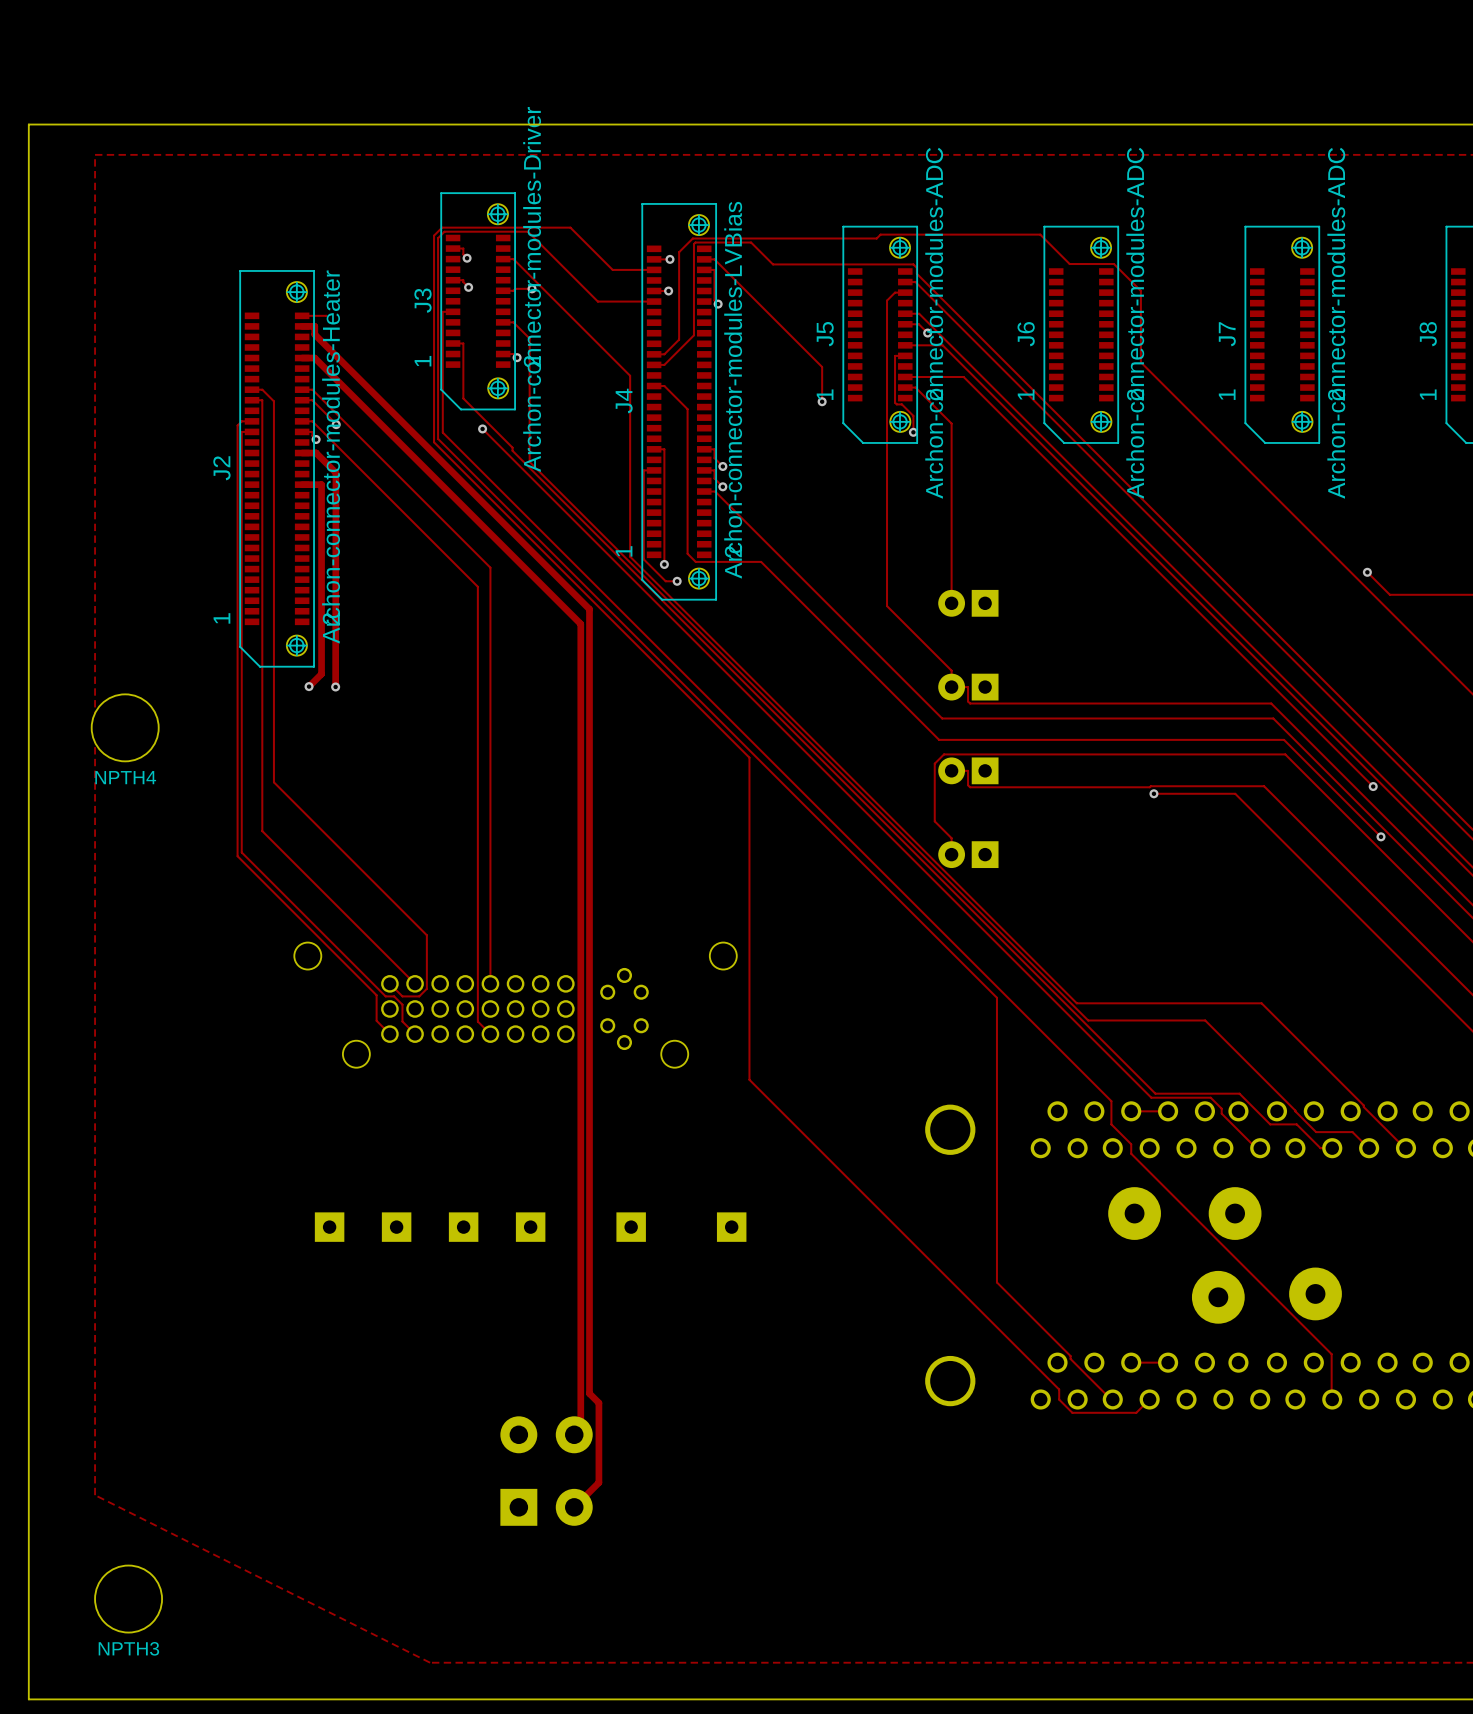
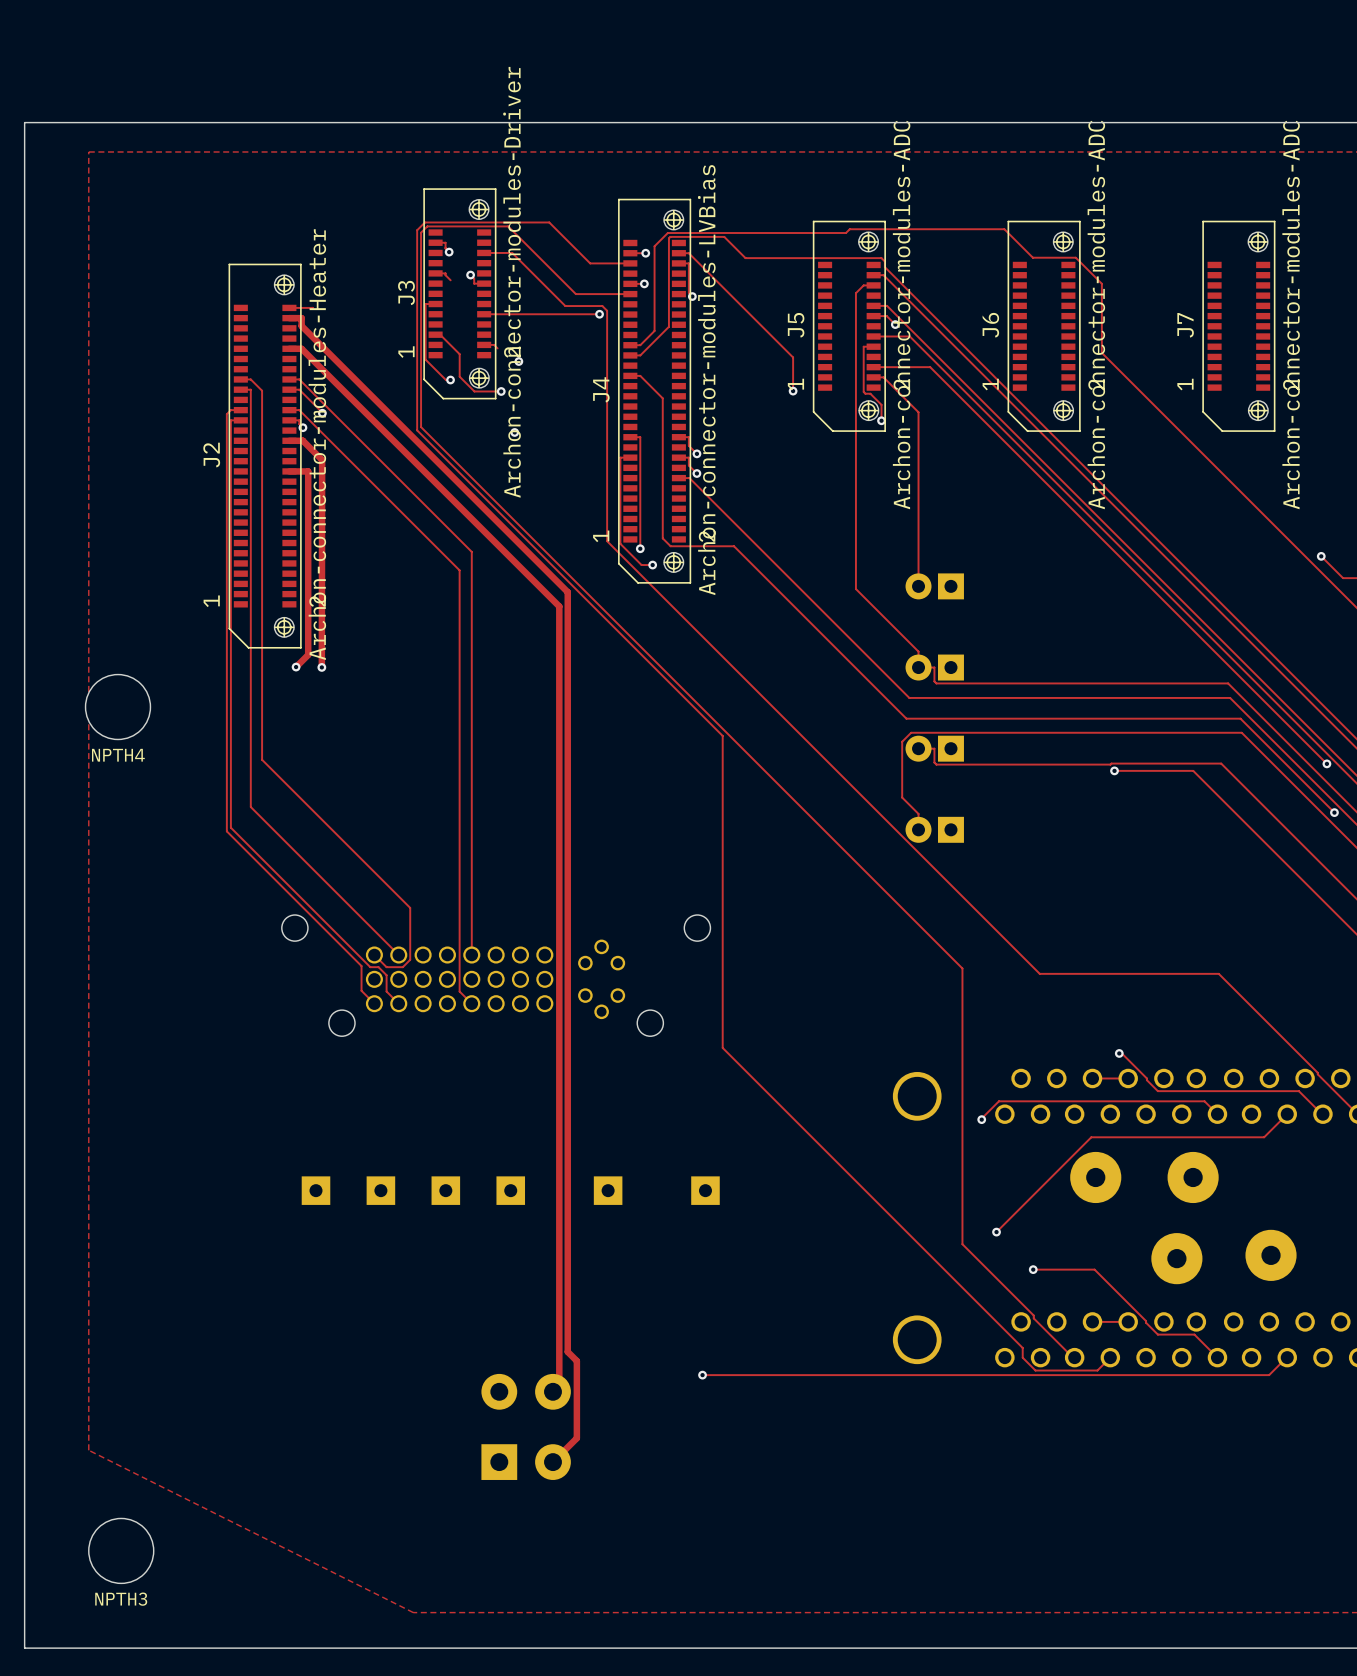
track: (513, 259) (630, 375) -> (494, 252) (512, 252) (565, 306) (602, 306) (607, 310) (607, 365)
via position: (468, 287) -> (470, 275)
track: (532, 288) (503, 290) -> (470, 275) (474, 278) (474, 283) (484, 283)
via: (532, 288) -> none
track: (513, 322) (529, 338) (529, 461) (1088, 1020) (1205, 1020) (1316, 1132) (1352, 1132) (1368, 1148) -> (494, 314) (599, 314)
via: none -> (599, 314)
track: (457, 343) (463, 343) (463, 398) (512, 447) (512, 450) (1155, 1093) (1239, 1093) (1270, 1124) -> (1119, 1053) (1121, 1053) (1157, 1091) (1227, 1091)
track: none -> (440, 334) (459, 354) (459, 376) (474, 391) (501, 391)
via: (517, 357) -> none
track: (442, 369) (442, 432) (1111, 1101) (1111, 1124) (1131, 1144) (1131, 1153) (1331, 1354) (1331, 1399) -> (702, 1375) (1269, 1375) (1286, 1357)
track: none -> (425, 359) (445, 380) (450, 380)
via: none -> (518, 361)
via: none -> (450, 380)
via: none -> (501, 391)
track: (482, 428) (1151, 1097) (1210, 1097) (1221, 1108) (1221, 1113) (1256, 1148) (1260, 1148) -> (981, 1119) (998, 1101) (1204, 1101) (1217, 1114)
via: (482, 428) -> none
via: none -> (514, 432)
via: none -> (1119, 1053)
track: (1296, 1124) (1320, 1148) (1332, 1148) -> (1252, 1091) (1298, 1091) (1321, 1114)
track: none -> (1287, 1114) (1264, 1137) (1091, 1137) (996, 1232)
via: none -> (981, 1119)
via: none -> (996, 1232)
track: none -> (1033, 1269) (1094, 1269) (1157, 1334) (1194, 1334) (1217, 1357)
via: none -> (1033, 1269)
via: none -> (702, 1375)

